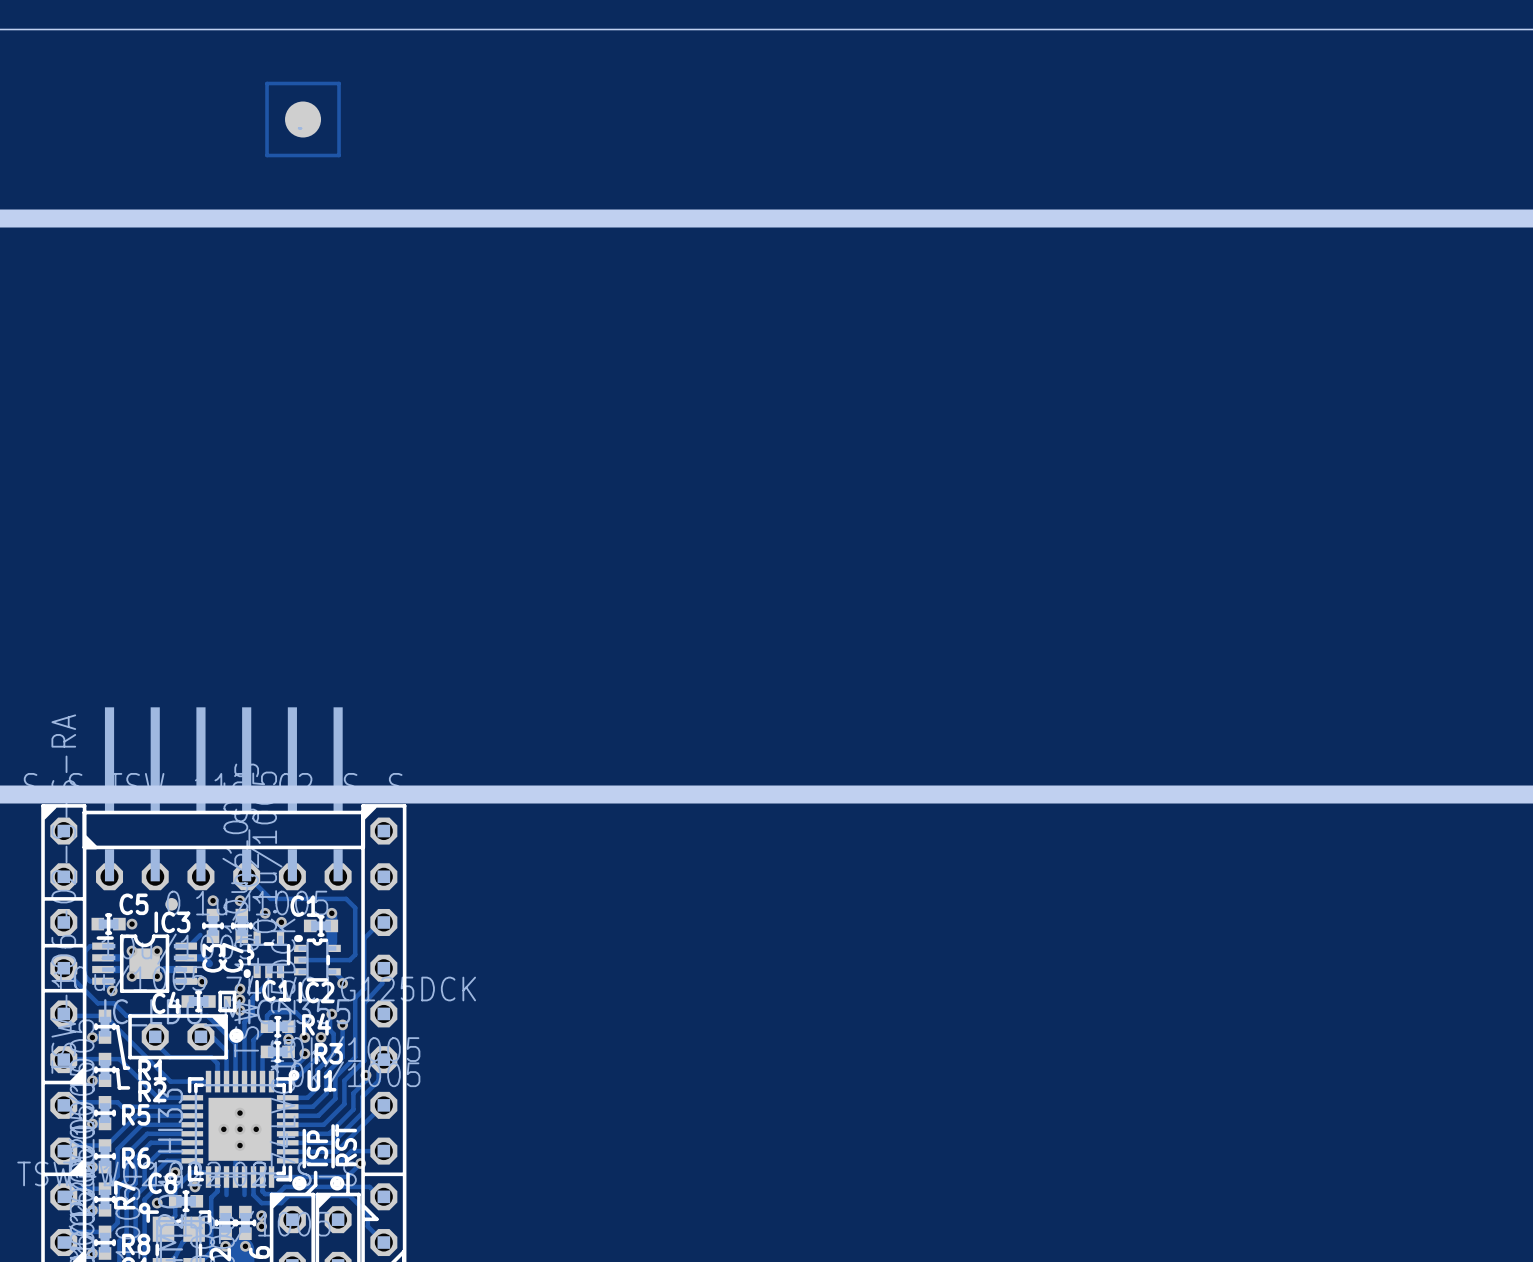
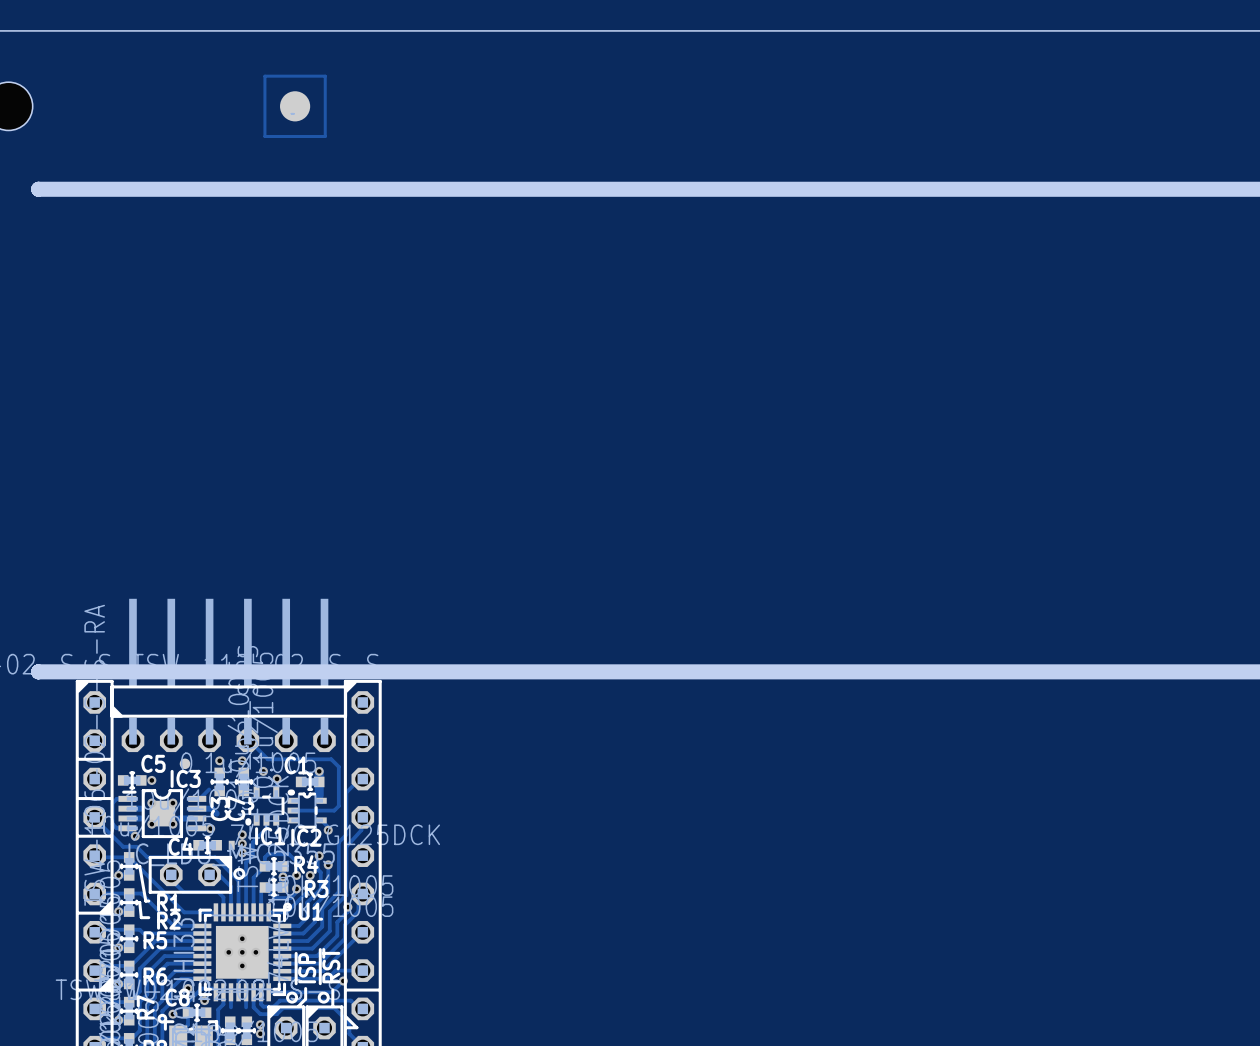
part footprint: [218, 990, 237, 1013] -> [228, 840, 235, 850]
drawing: [232, 1032, 241, 1040] -> none
drawing: [295, 1179, 304, 1187] -> none
drawing: [333, 1179, 341, 1187] -> none

